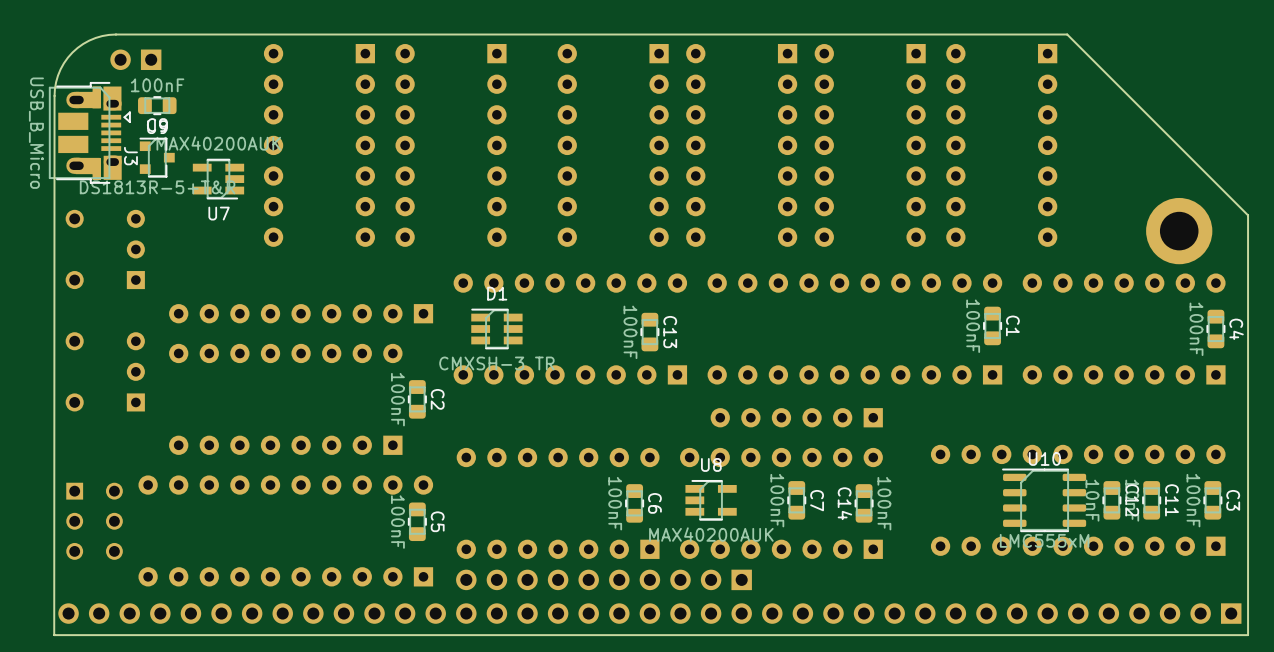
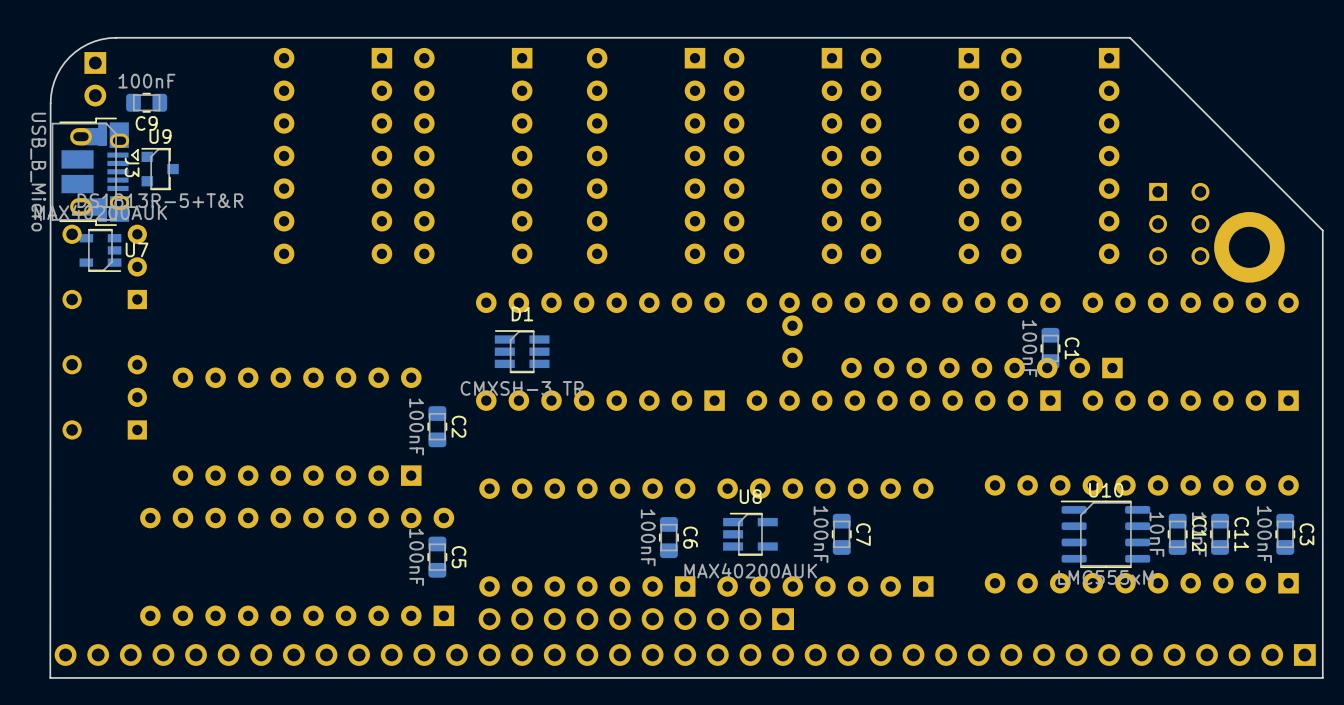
part rotation: 0° (135, 59) -> 90° counterclockwise (95, 79)
part position: (135, 59) -> (95, 79)
C9 position: (157, 105) -> (146, 102)
J3 position: (89, 132) -> (95, 171)
U7 footprint: [192, 158, 245, 200] -> [79, 228, 122, 272]
part: none -> (1179, 223)
U7 name position: U7 (219, 213) -> U7 (137, 249)
part: (301, 313) -> none
part: none -> (792, 341)
C4: 100nF (1215, 329) -> none
C13: 100nF (649, 332) -> none
part: none -> (981, 367)
part: (796, 417) -> none
C14: 100nF (864, 503) -> none
part: (94, 521) -> none

